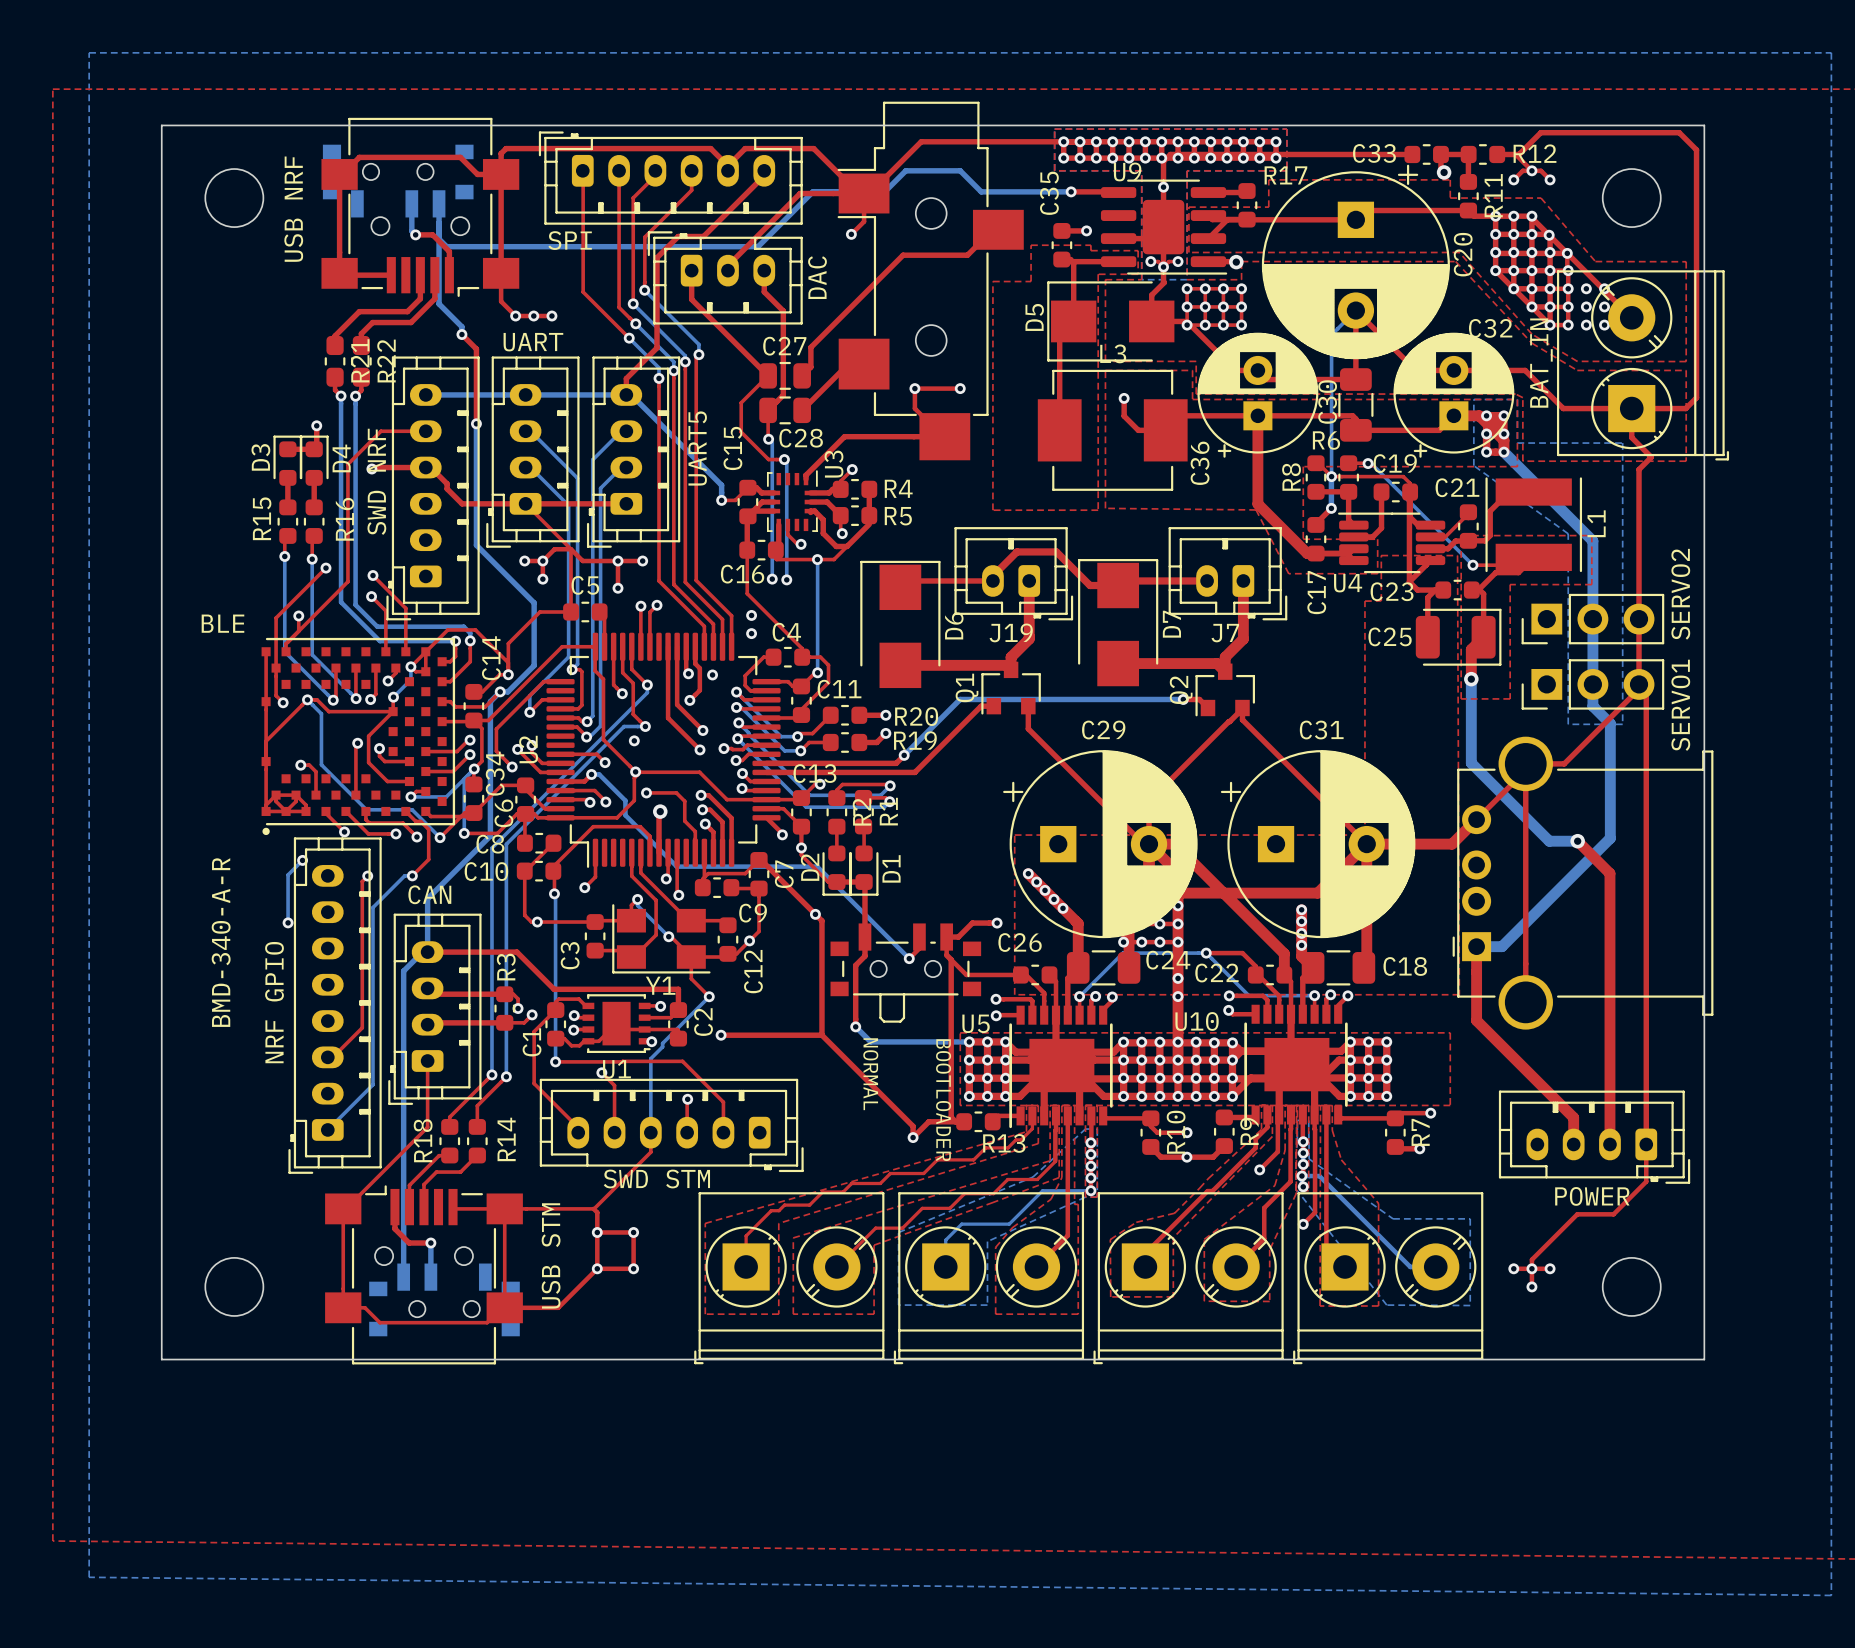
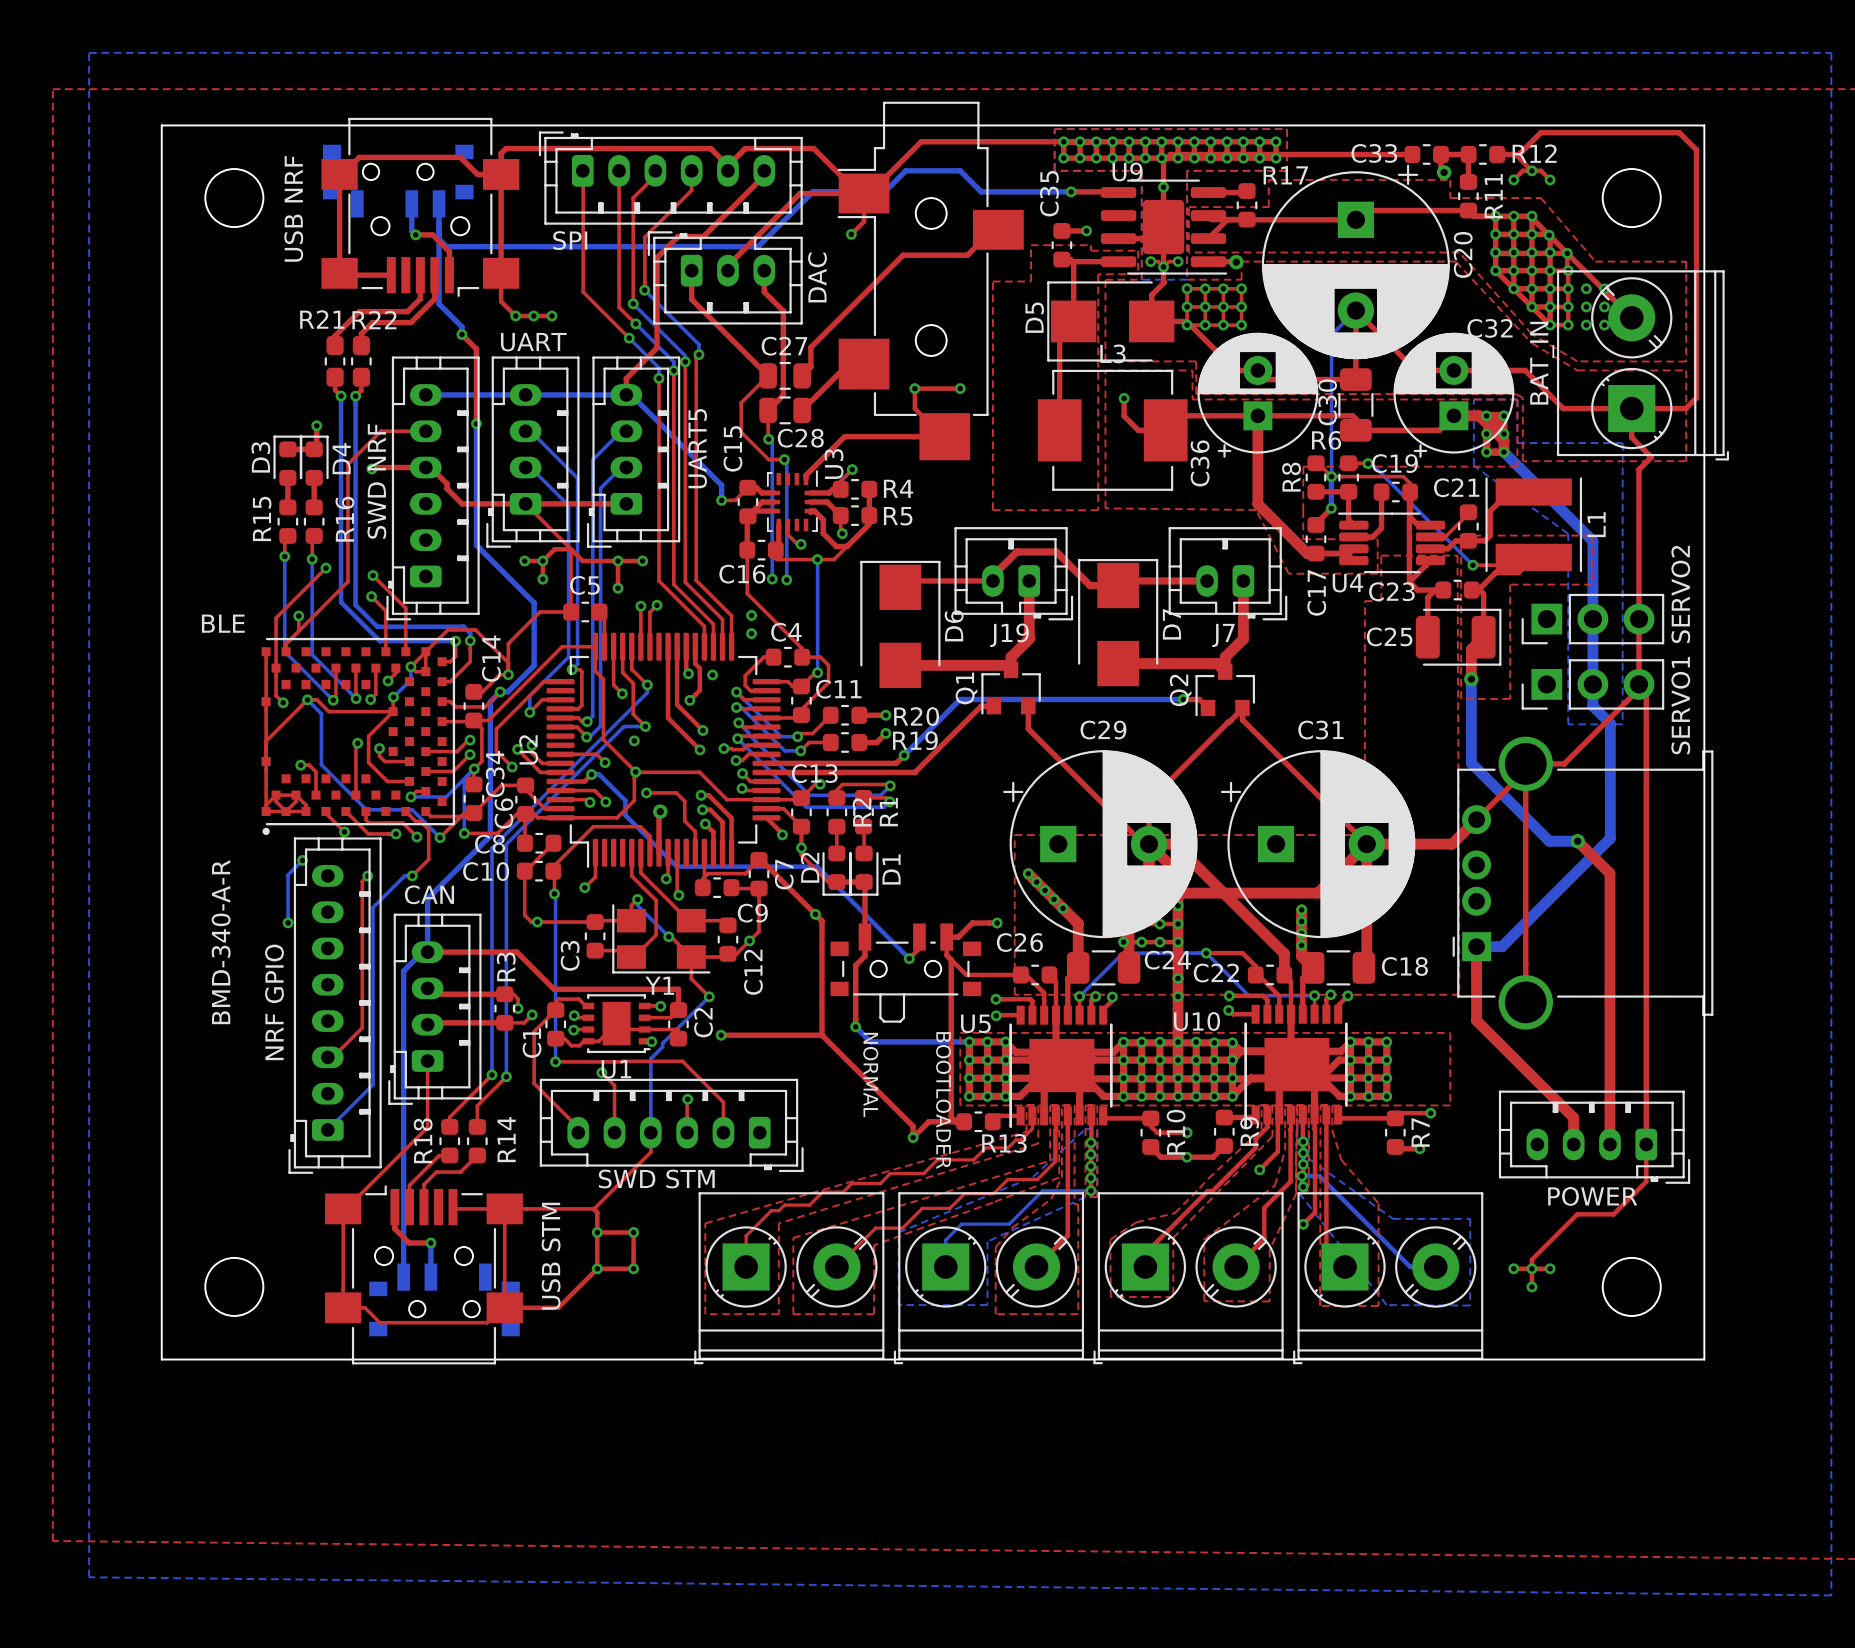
R21 name rotation: 0° (360, 360) -> 90° clockwise (322, 319)
R22 name rotation: 0° (386, 361) -> 90° clockwise (374, 320)

